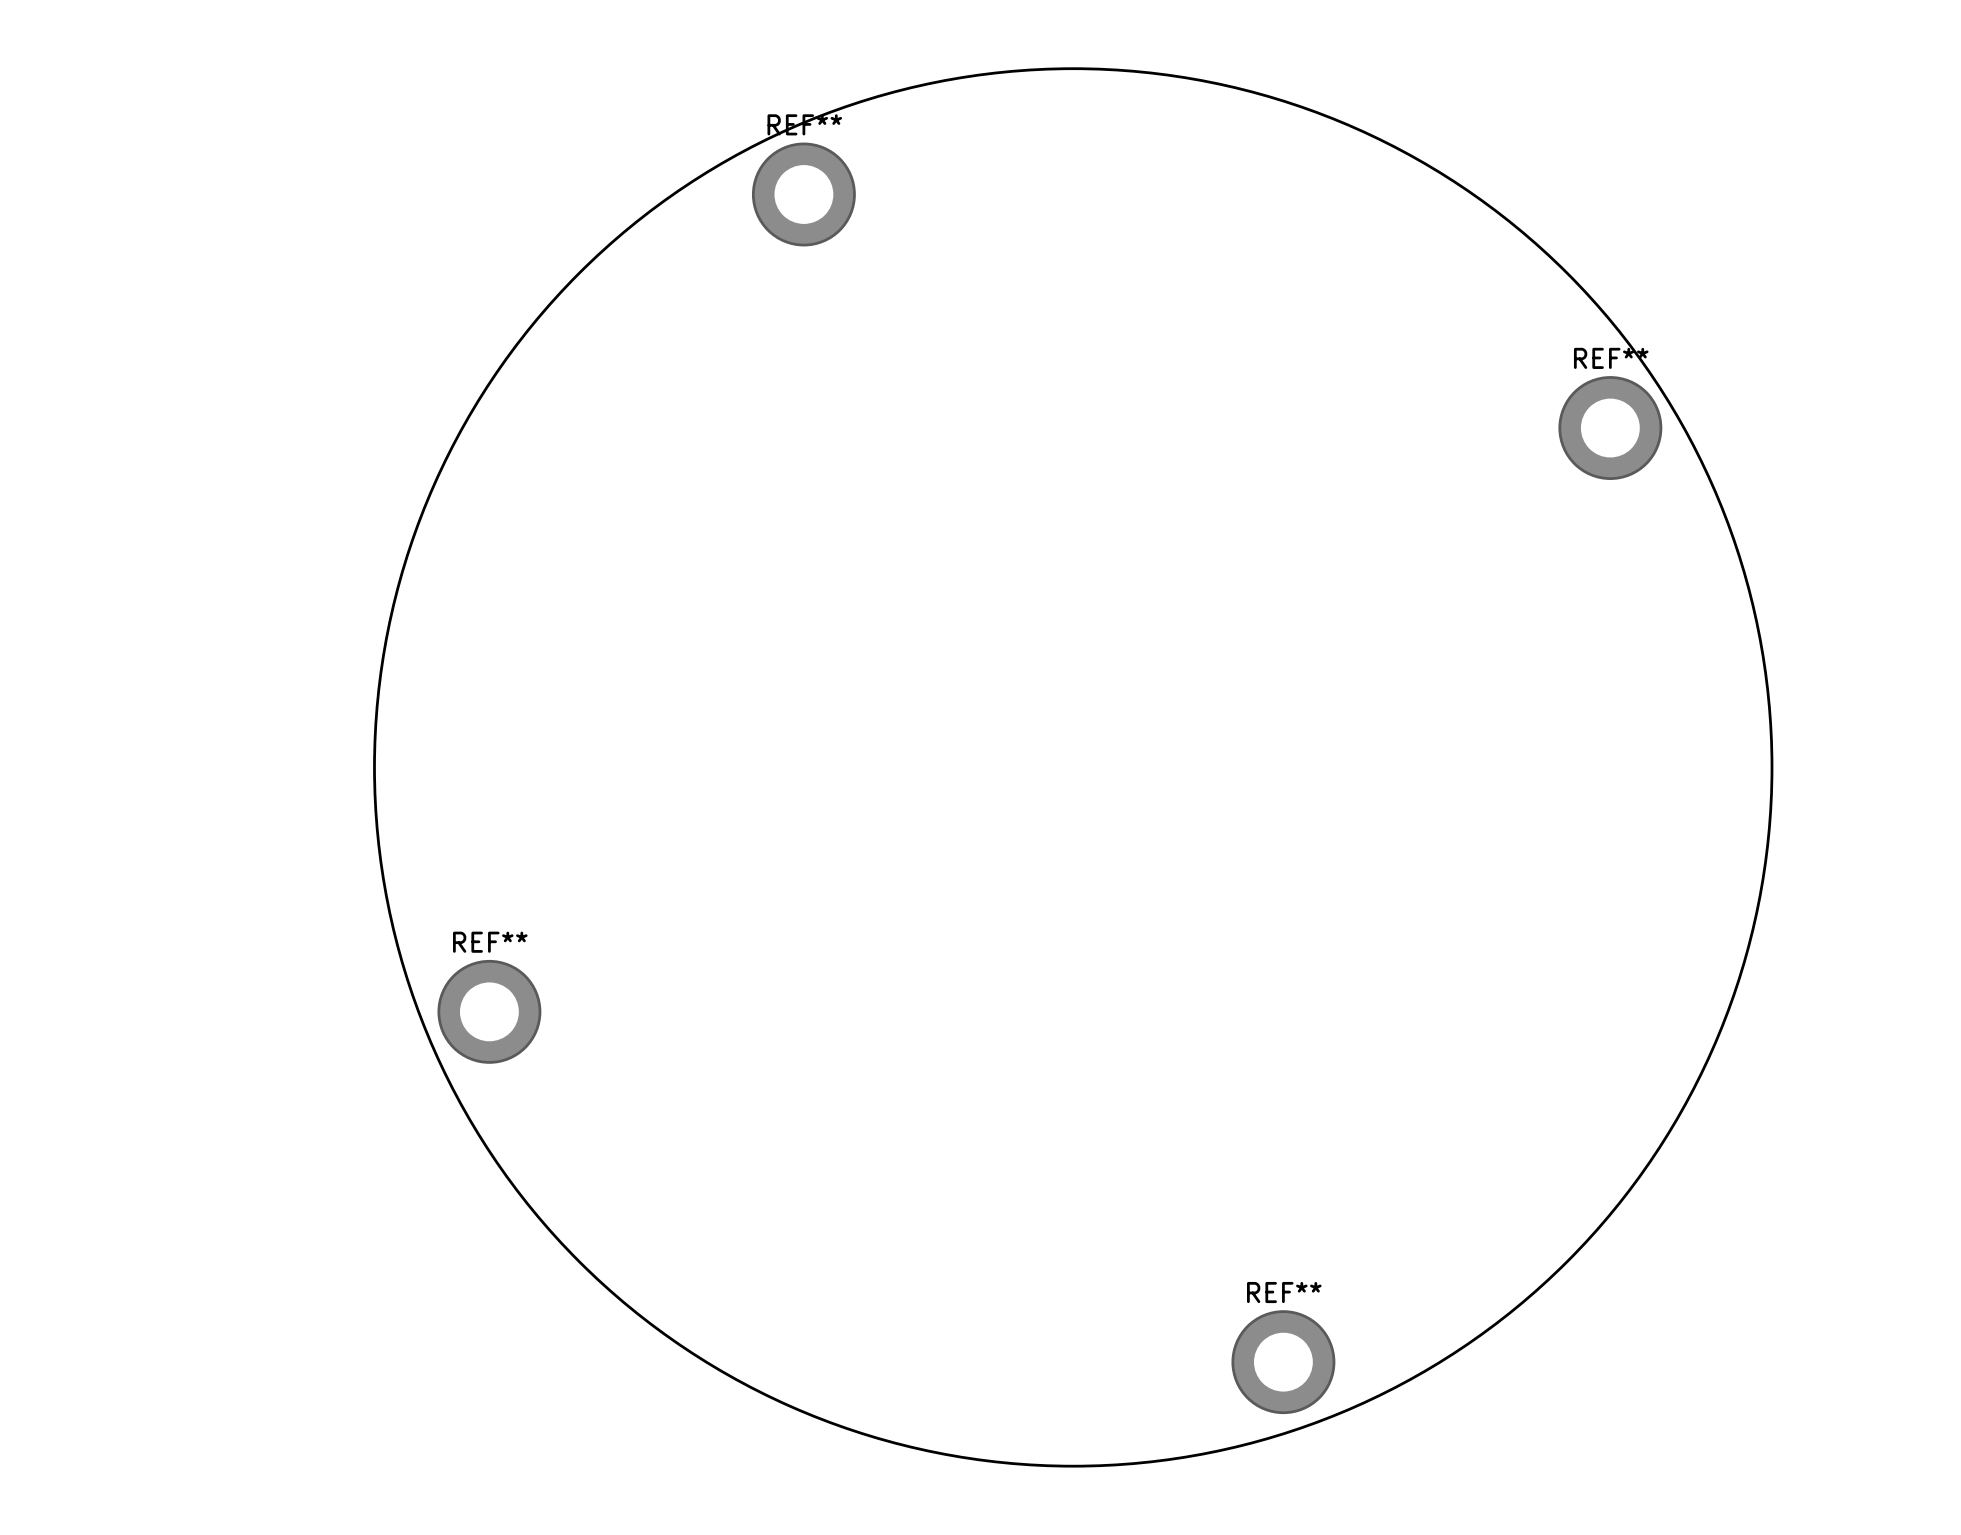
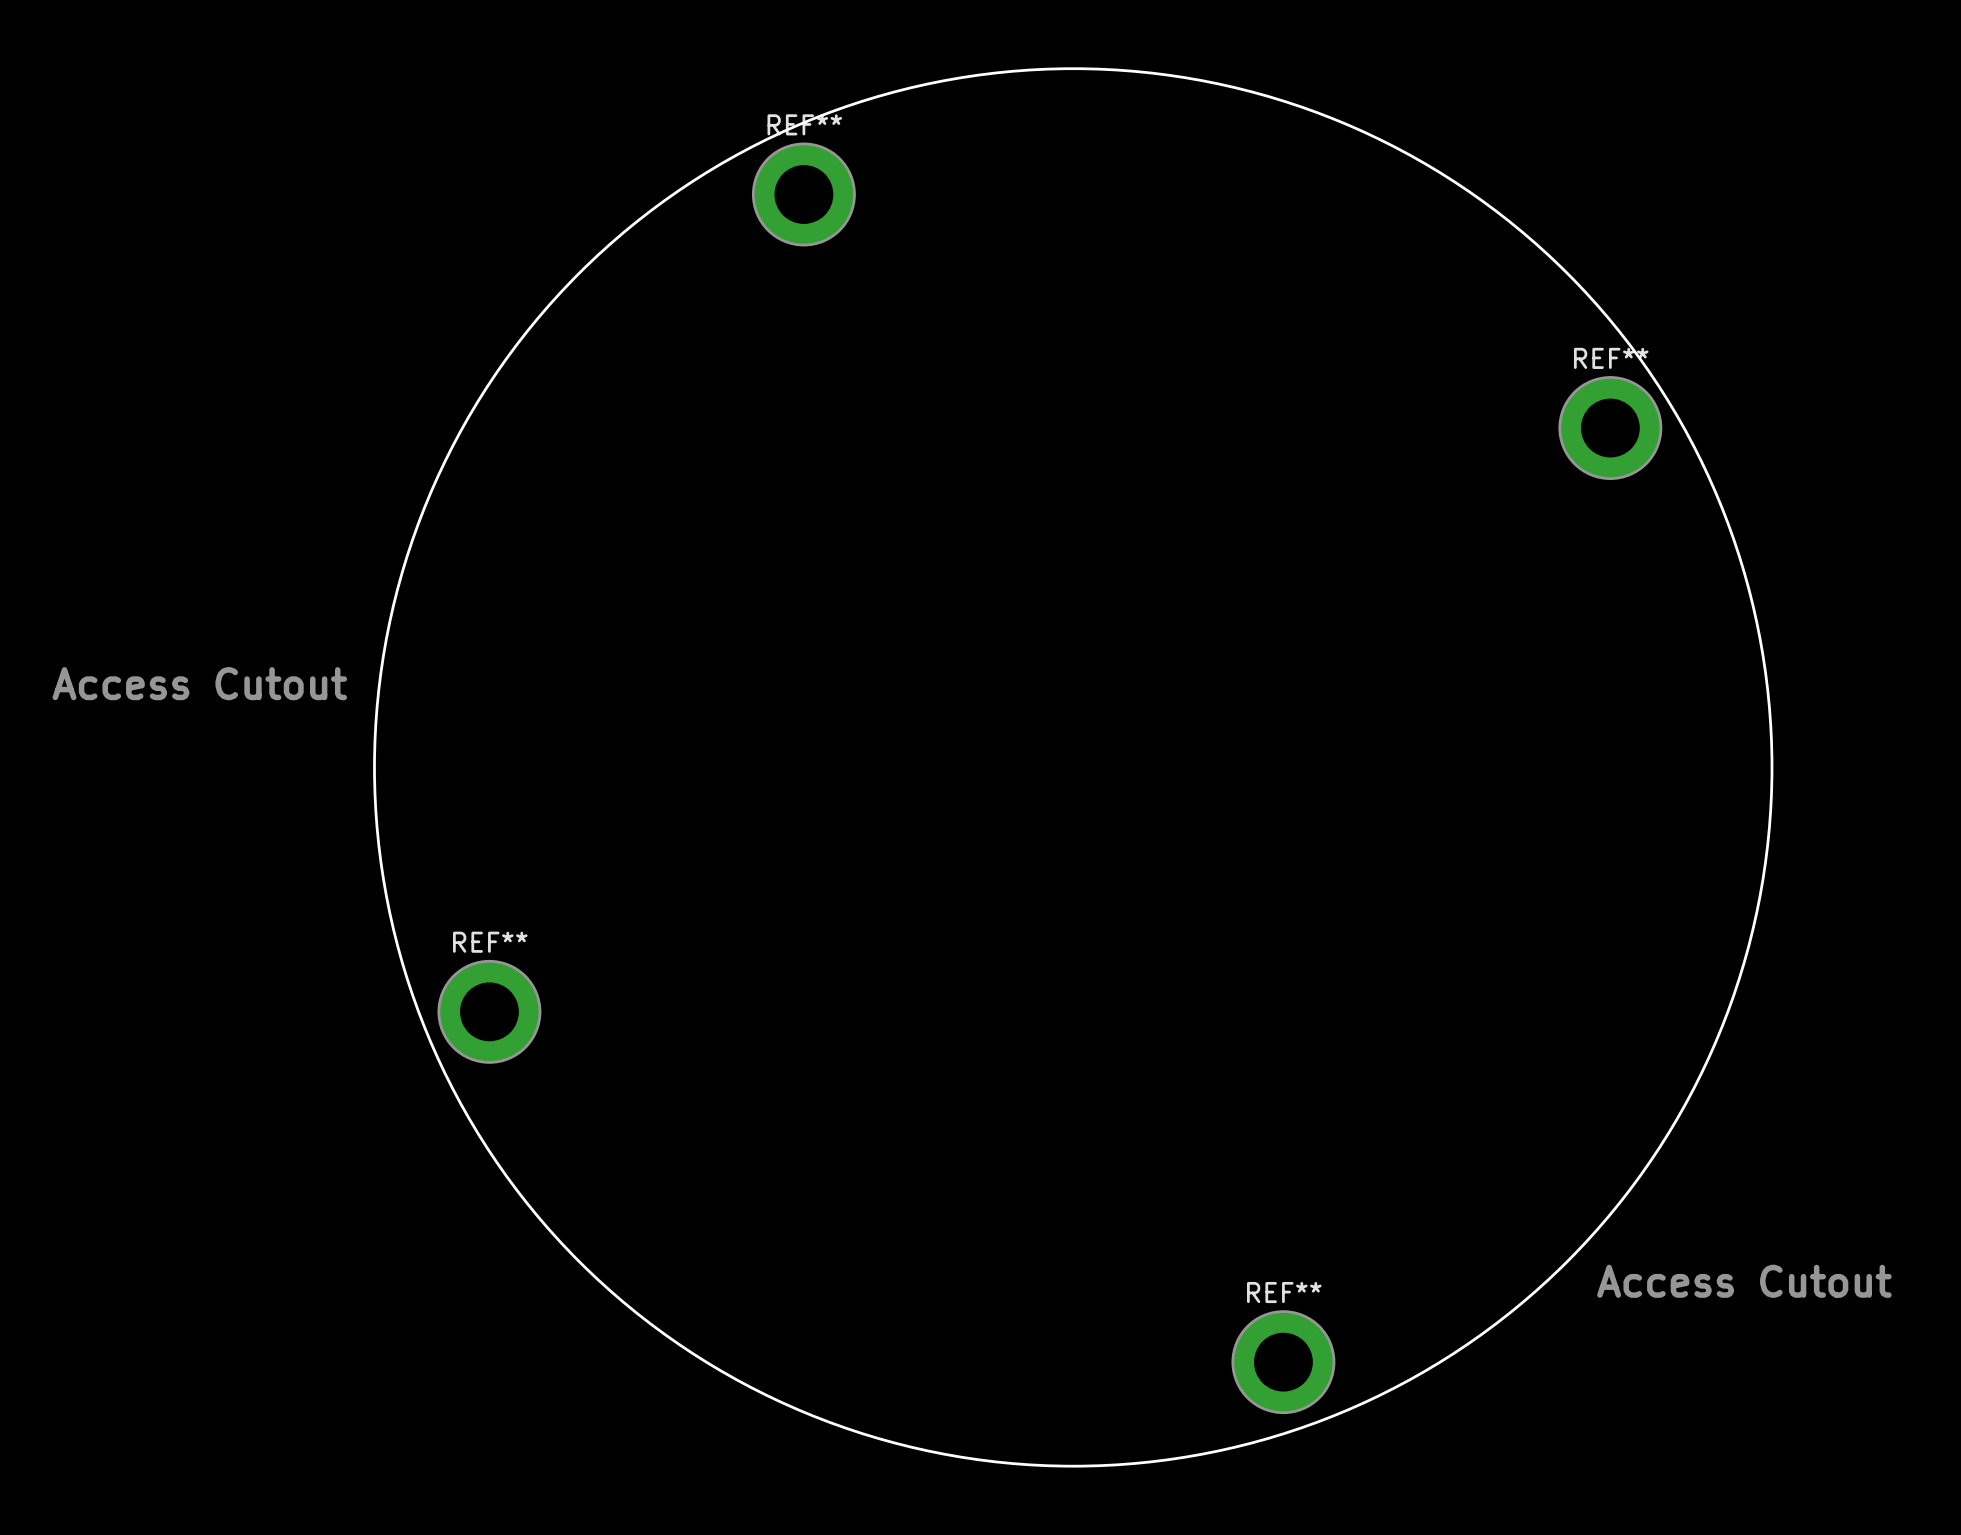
text: none -> Access Cutout (199, 683)
text: none -> Access Cutout (1744, 1281)

